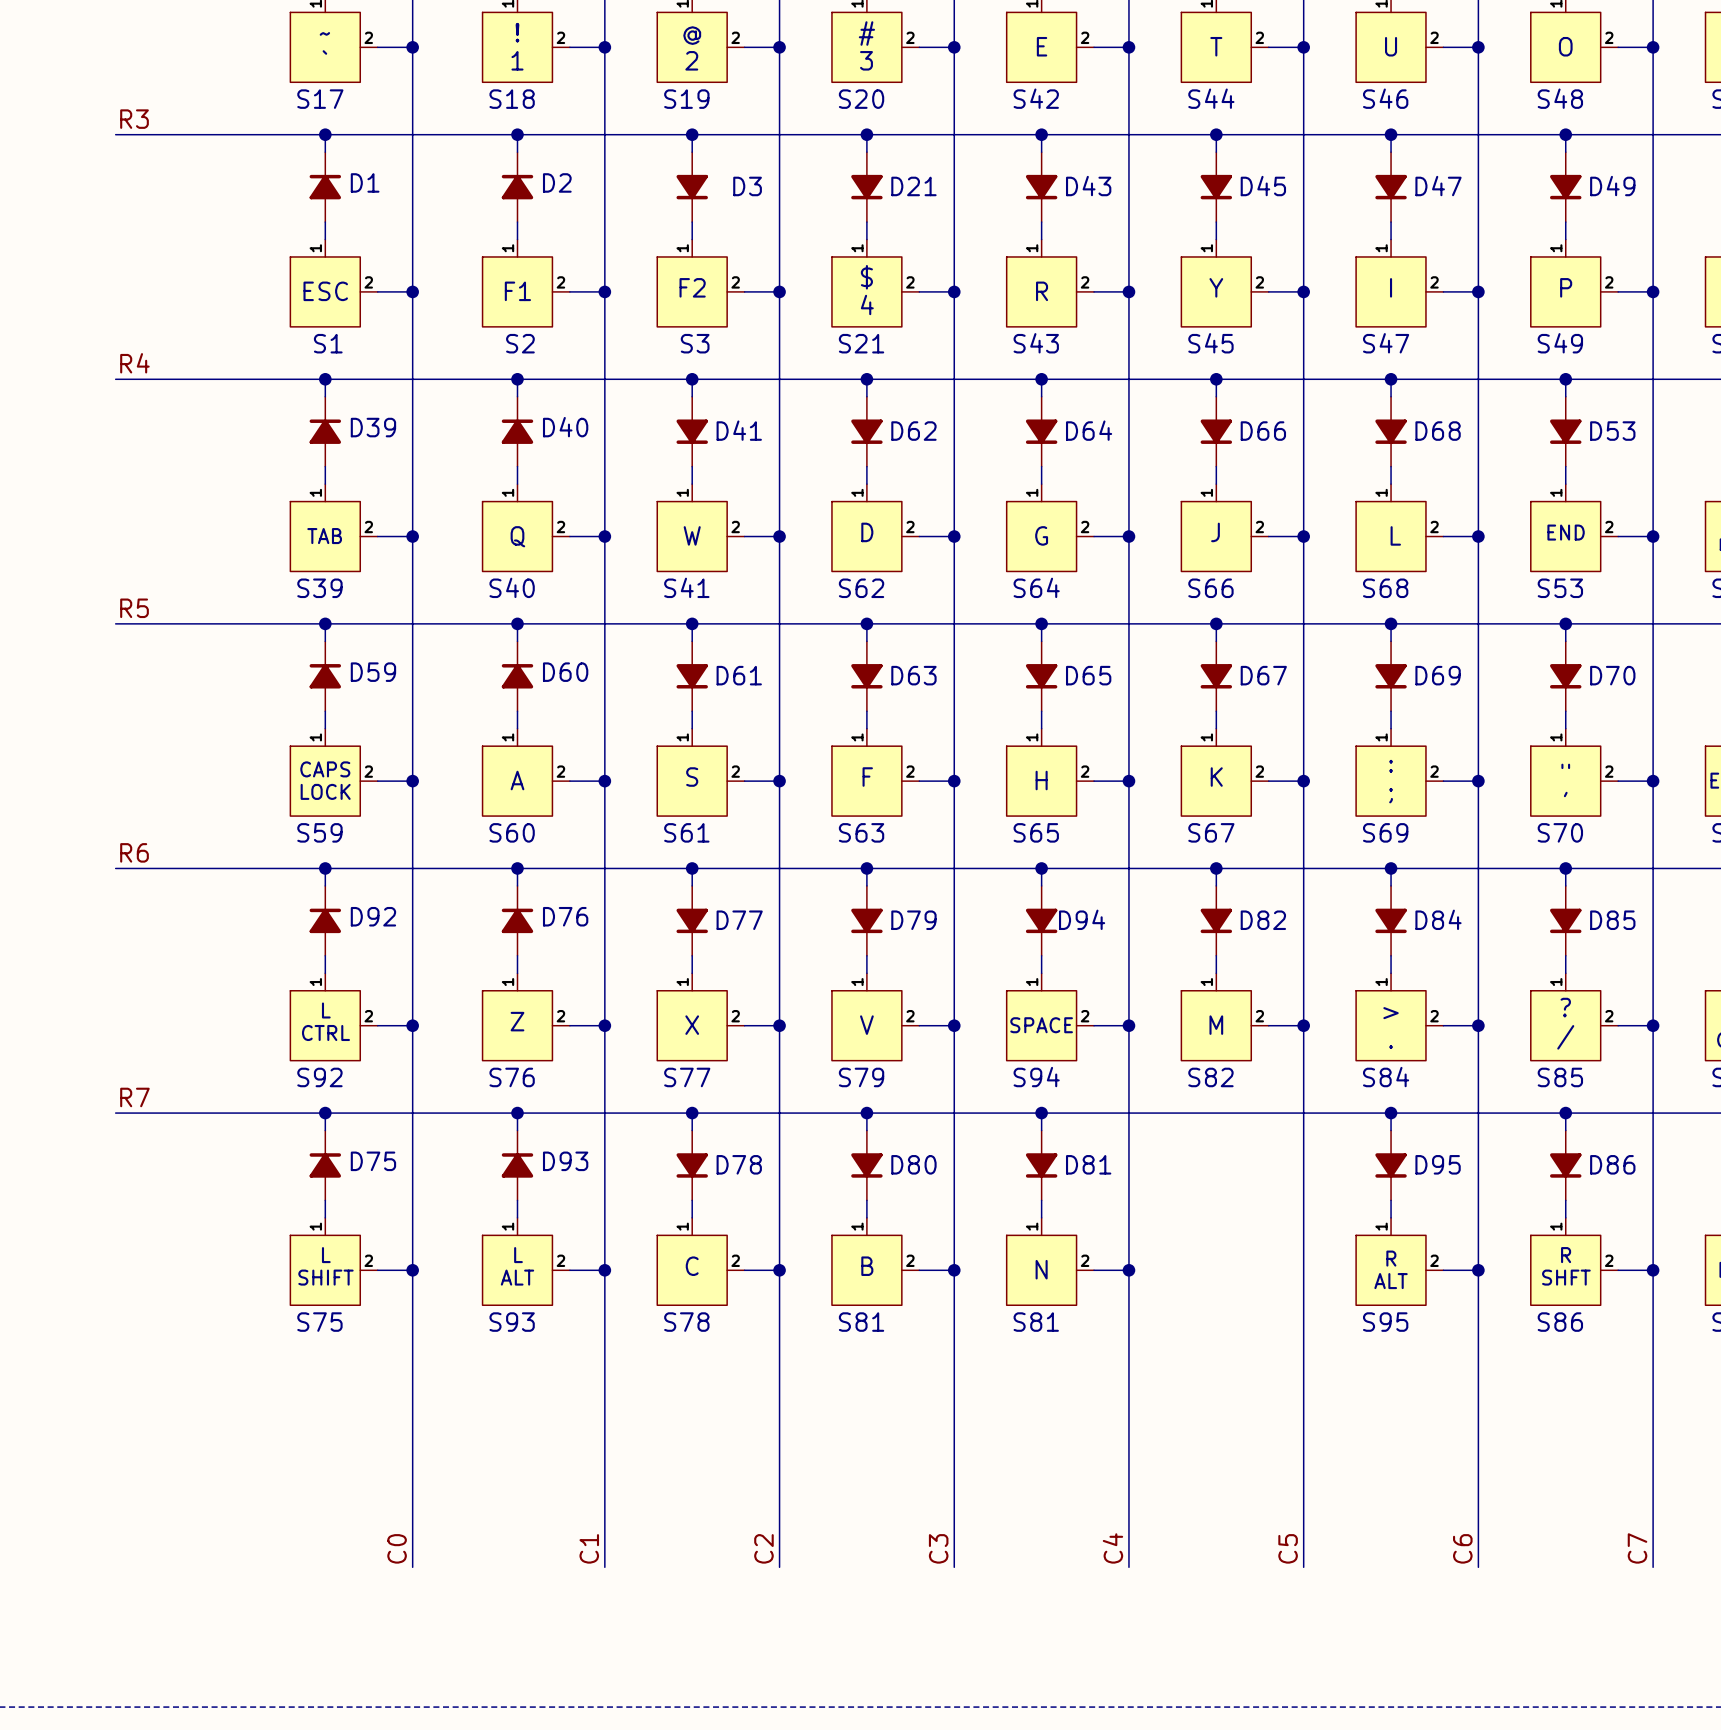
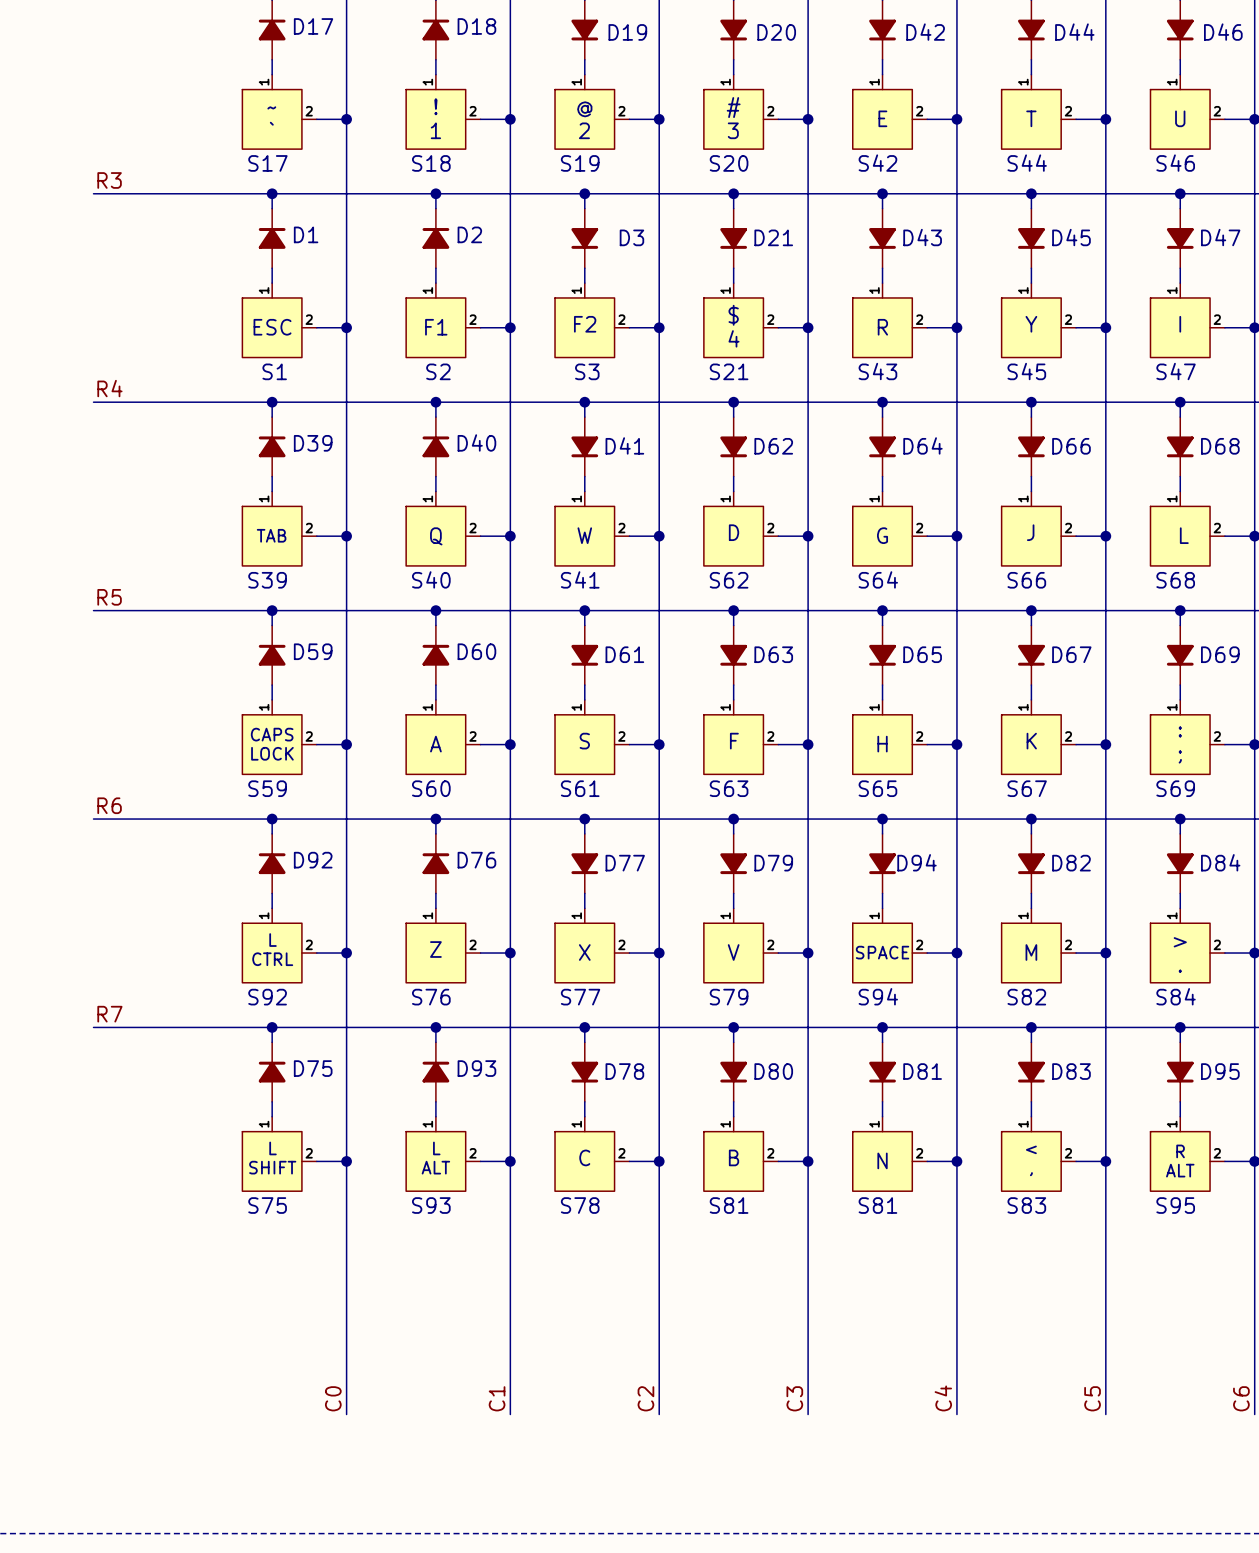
wire: none -> (1031, 1027) (1031, 1042)
junction: none -> (1031, 1027)
D83: none -> (1031, 1072)
wire: none -> (1031, 1101) (1031, 1116)
text: none -> < (1031, 1149)
S83: none -> (1038, 1153)
wire: none -> (1076, 1161) (1105, 1161)
junction: none -> (1105, 1161)
text: none -> , (1031, 1174)

